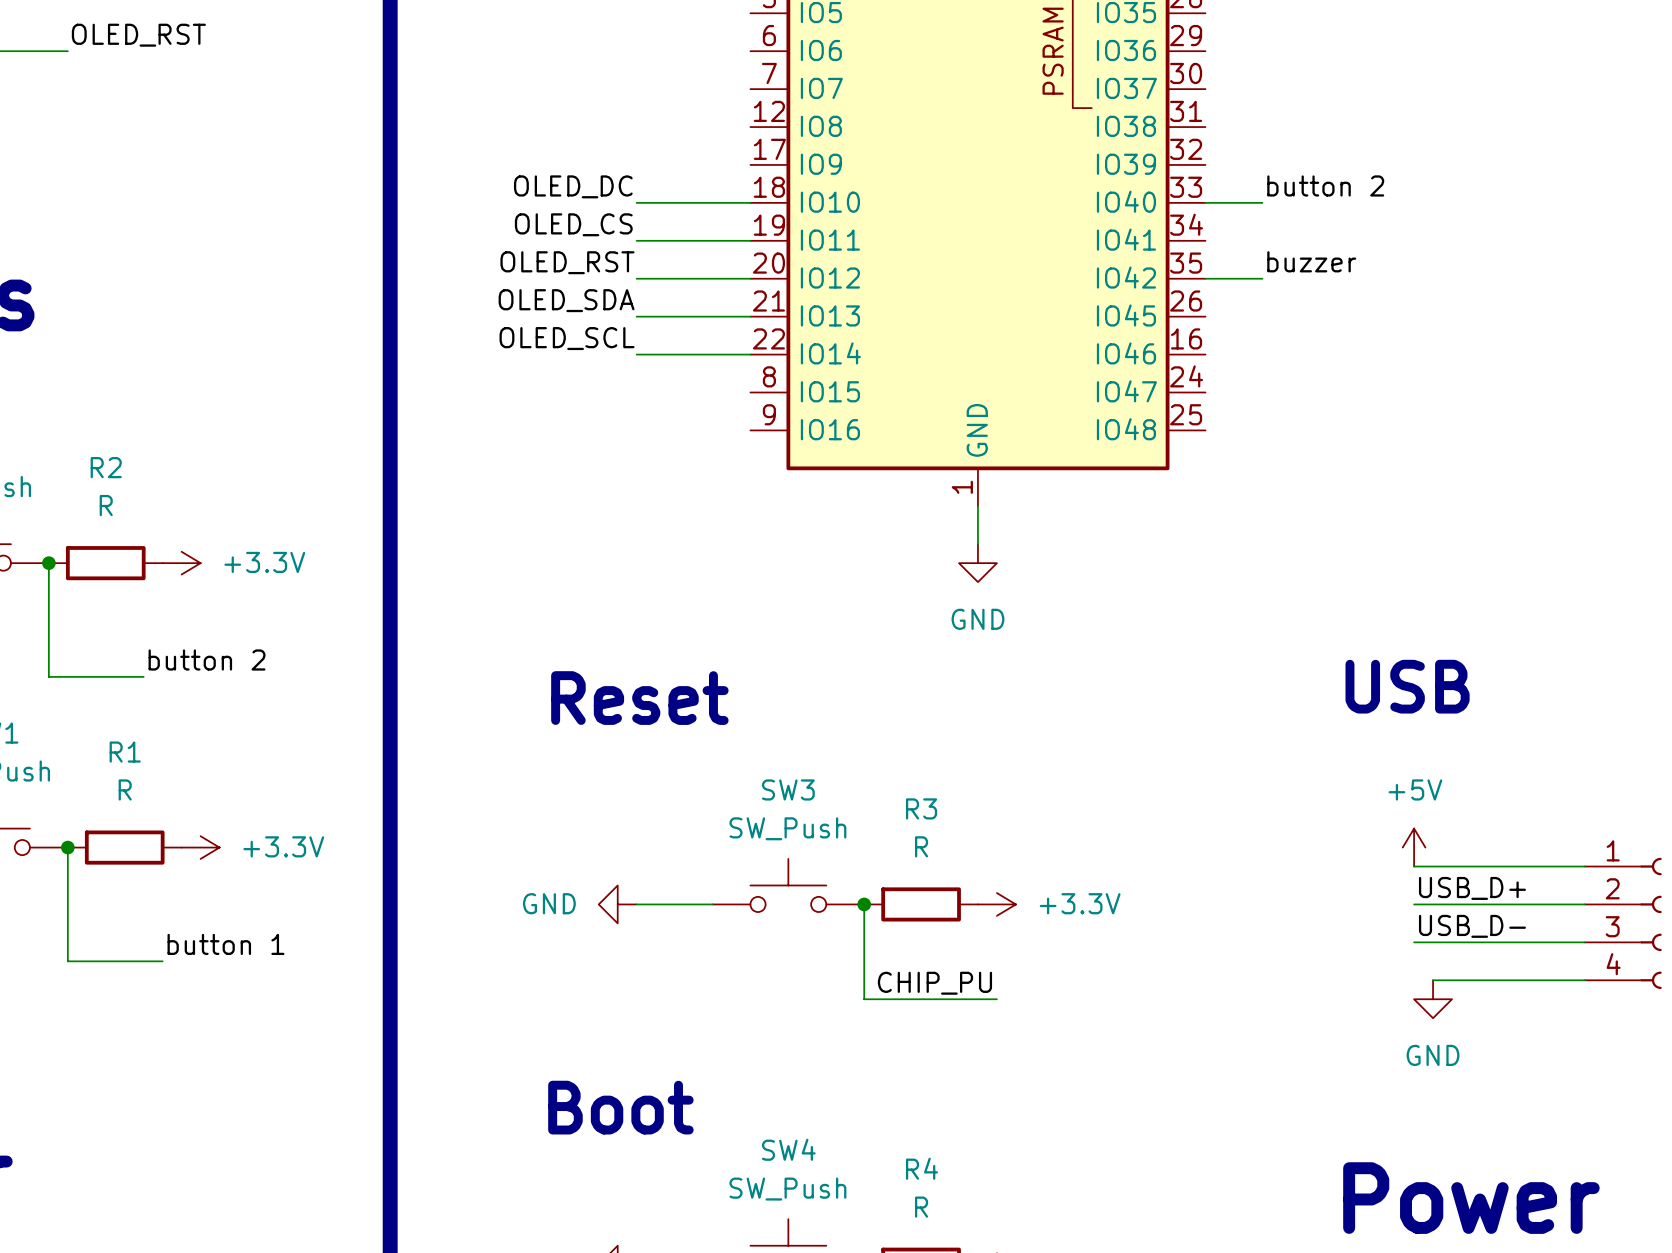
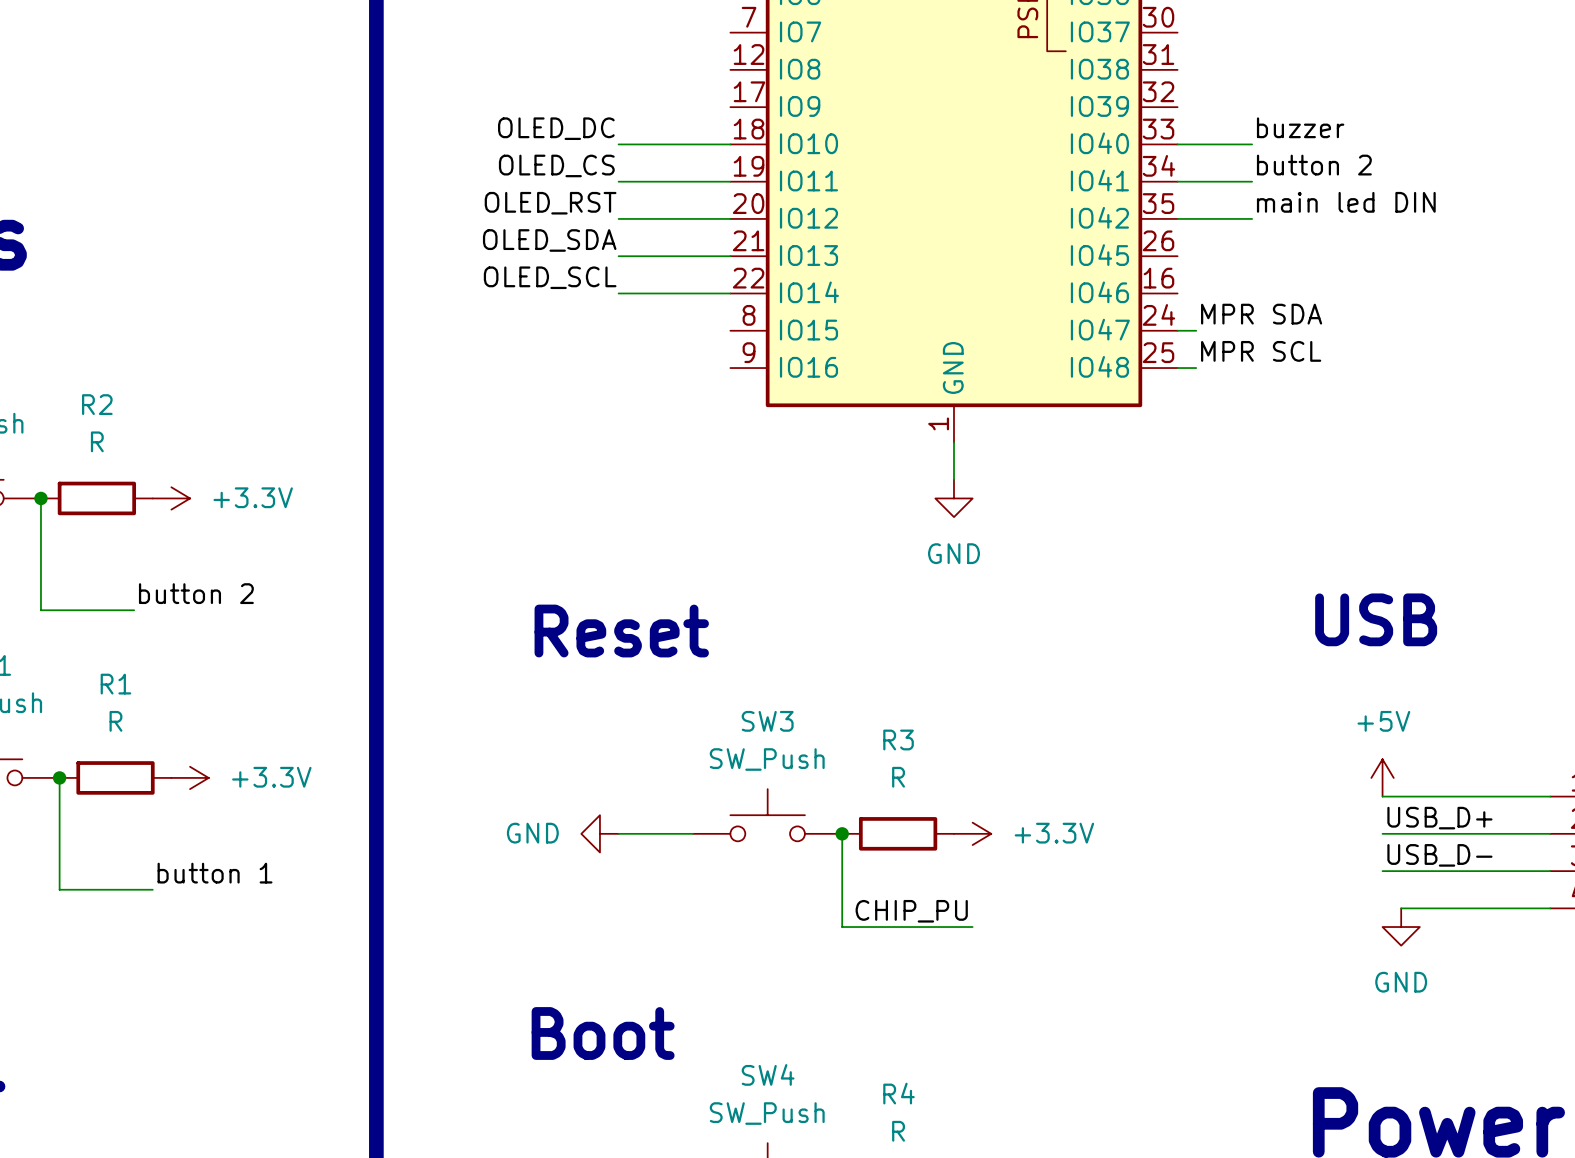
label position: button 2 (1325, 185) -> button 2 (1314, 165)
wire: none -> (1233, 144) (1252, 144)
wire: none -> (1177, 181) (1252, 181)
label position: buzzer (1311, 261) -> buzzer (1300, 127)
label: none -> main led DIN (1346, 202)
wire: none -> (1233, 218) (1252, 218)
label: none -> MPR SDA (1261, 314)
wire: none -> (1177, 330) (1196, 330)
label: none -> MPR SCL (1261, 351)
wire: none -> (1177, 368) (1196, 368)

